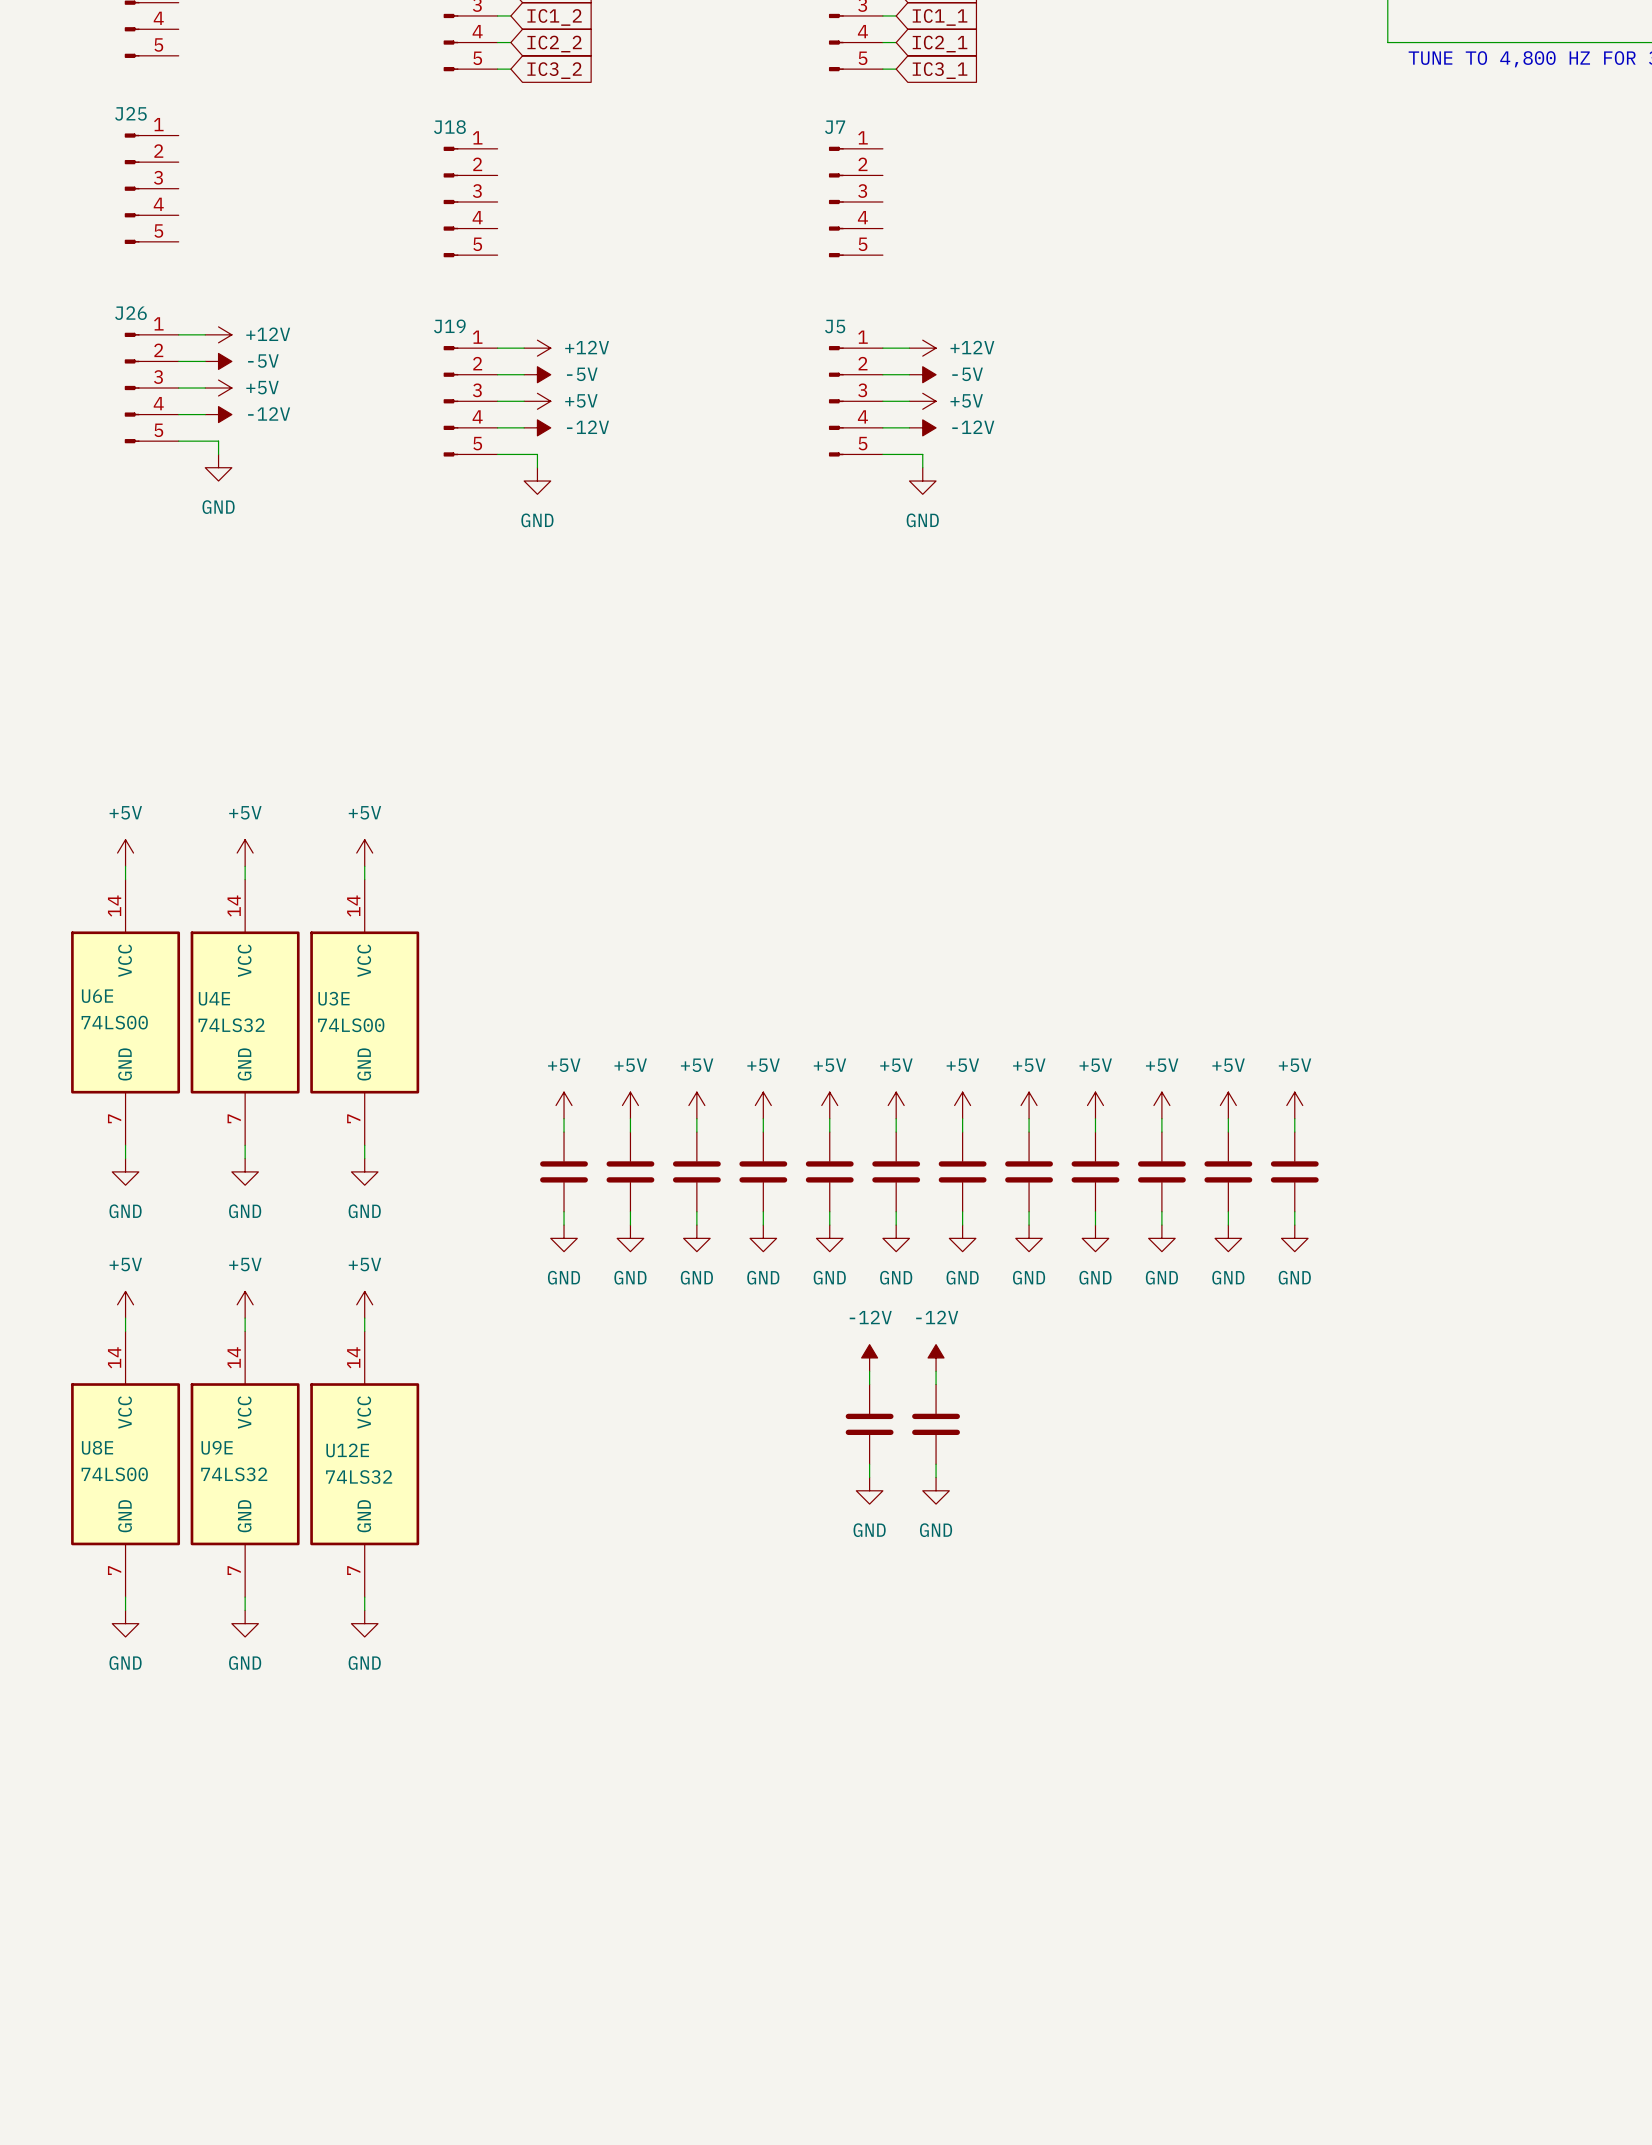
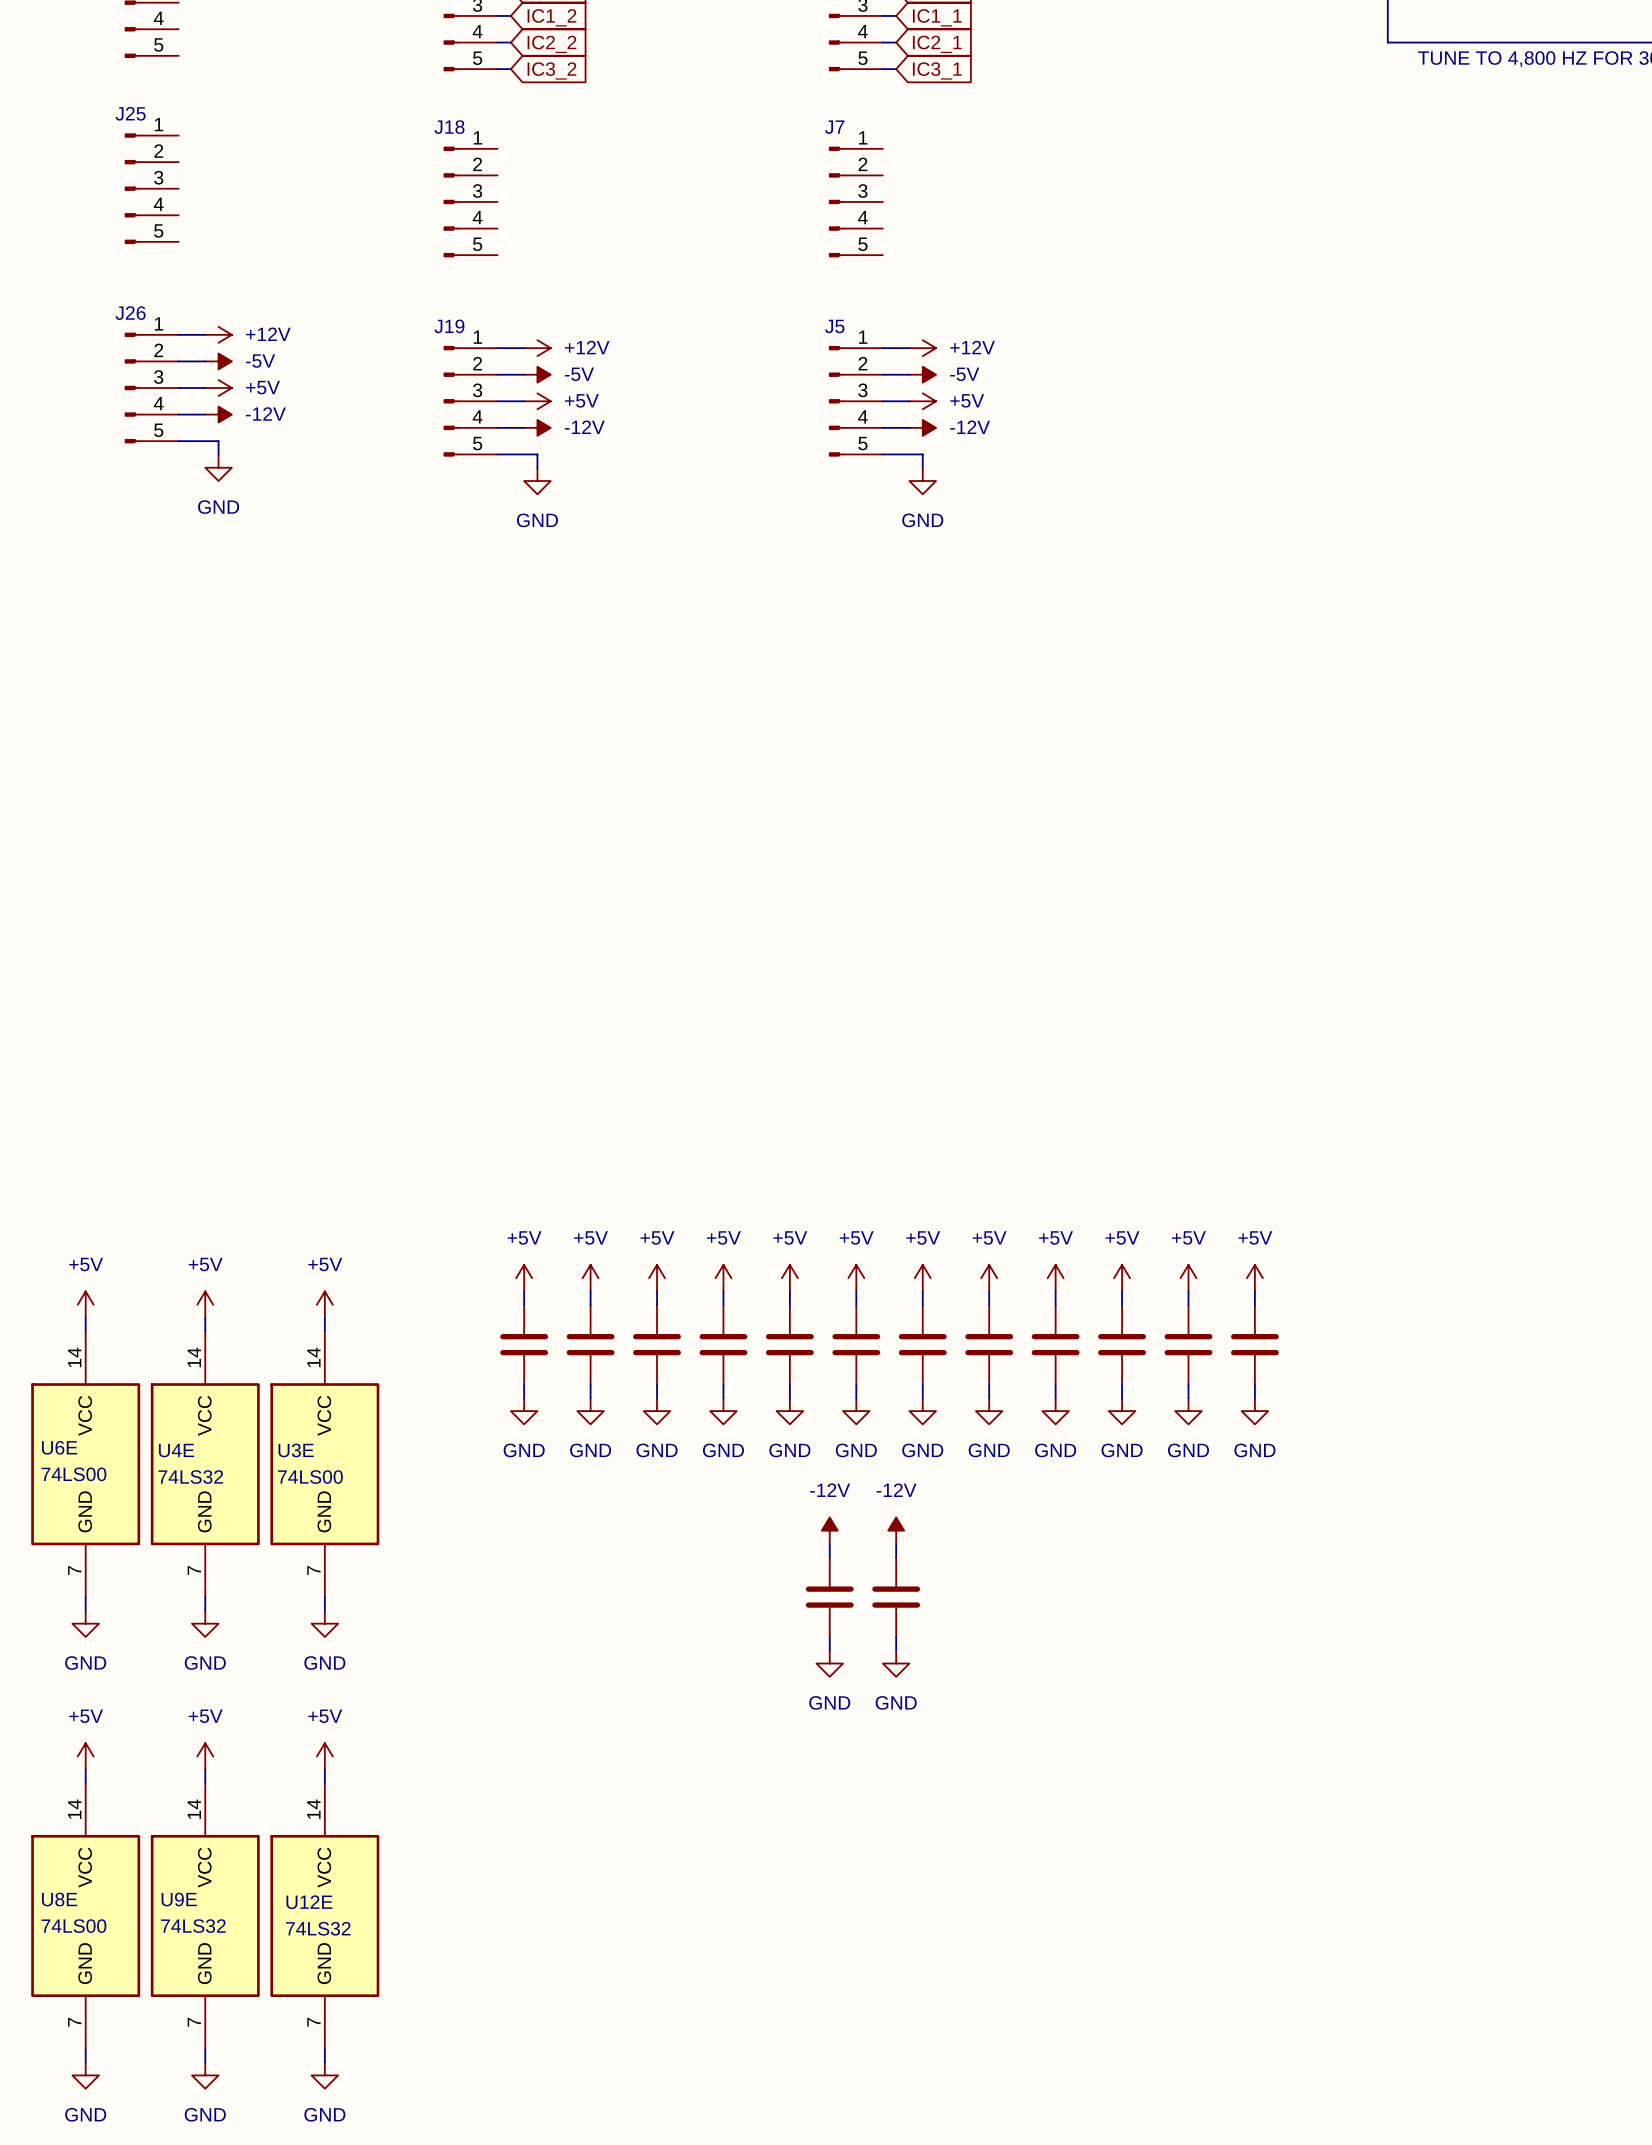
power symbol: +5V (125, 853) -> none
power symbol: +5V (245, 853) -> none
power symbol: +5V (364, 853) -> none
wire: (125, 866) (125, 879) -> none
wire: (245, 866) (245, 879) -> none
wire: (364, 866) (364, 879) -> none
U6E position: (125, 1012) -> (85, 1464)
U4E position: (245, 1012) -> (205, 1464)
U3E position: (364, 1012) -> (324, 1464)
power symbol: +5V (564, 1105) -> none
power symbol: +5V (630, 1105) -> none
power symbol: +5V (696, 1105) -> none
power symbol: +5V (763, 1105) -> none
power symbol: +5V (829, 1105) -> none
power symbol: +5V (896, 1105) -> none
power symbol: +5V (962, 1105) -> none
power symbol: +5V (1029, 1105) -> none
power symbol: +5V (1095, 1105) -> none
power symbol: +5V (1161, 1105) -> none
power symbol: +5V (1228, 1105) -> none
power symbol: +5V (1294, 1105) -> none
wire: (564, 1118) (564, 1132) -> (524, 1291) (524, 1304)
wire: (630, 1118) (630, 1132) -> (590, 1291) (590, 1304)
wire: (696, 1118) (696, 1132) -> (657, 1291) (657, 1304)
wire: (763, 1118) (763, 1132) -> (723, 1291) (723, 1304)
wire: (829, 1118) (829, 1132) -> (789, 1291) (789, 1304)
wire: (896, 1118) (896, 1132) -> (856, 1291) (856, 1304)
wire: (962, 1118) (962, 1132) -> (922, 1291) (922, 1304)
wire: (1029, 1118) (1029, 1132) -> (989, 1291) (989, 1304)
wire: (1095, 1118) (1095, 1132) -> (1055, 1291) (1055, 1304)
wire: (1161, 1118) (1161, 1132) -> (1122, 1291) (1122, 1304)
wire: (1228, 1118) (1228, 1132) -> (1188, 1291) (1188, 1304)
wire: (1294, 1118) (1294, 1132) -> (1254, 1291) (1254, 1304)
wire: (125, 1145) (125, 1158) -> (85, 1318) (85, 1331)
wire: (245, 1145) (245, 1158) -> (205, 1318) (205, 1331)
wire: (364, 1145) (364, 1158) -> (324, 1318) (324, 1331)
power symbol: GND (125, 1171) -> none
power symbol: GND (245, 1171) -> none
power symbol: GND (364, 1171) -> none
part: (564, 1171) -> none
part: (630, 1171) -> none
part: (696, 1171) -> none
part: (763, 1171) -> none
part: (829, 1171) -> none
part: (896, 1171) -> none
part: (962, 1171) -> none
part: (1029, 1171) -> none
part: (1095, 1171) -> none
part: (1161, 1171) -> none
part: (1228, 1171) -> none
part: (1294, 1171) -> none
wire: (564, 1211) (564, 1225) -> (524, 1384) (524, 1397)
wire: (630, 1211) (630, 1225) -> (590, 1384) (590, 1397)
wire: (696, 1211) (696, 1225) -> (657, 1384) (657, 1397)
wire: (763, 1211) (763, 1225) -> (723, 1384) (723, 1397)
wire: (829, 1211) (829, 1225) -> (789, 1384) (789, 1397)
wire: (896, 1211) (896, 1225) -> (856, 1384) (856, 1397)
wire: (962, 1211) (962, 1225) -> (922, 1384) (922, 1397)
wire: (1029, 1211) (1029, 1225) -> (989, 1384) (989, 1397)
wire: (1095, 1211) (1095, 1225) -> (1055, 1384) (1055, 1397)
wire: (1161, 1211) (1161, 1225) -> (1122, 1384) (1122, 1397)
wire: (1228, 1211) (1228, 1225) -> (1188, 1384) (1188, 1397)
wire: (1294, 1211) (1294, 1225) -> (1254, 1384) (1254, 1397)
power symbol: GND (564, 1238) -> none
power symbol: GND (630, 1238) -> none
power symbol: GND (696, 1238) -> none
power symbol: GND (763, 1238) -> none
power symbol: GND (829, 1238) -> none
power symbol: GND (896, 1238) -> none
power symbol: GND (962, 1238) -> none
power symbol: GND (1029, 1238) -> none
power symbol: GND (1095, 1238) -> none
power symbol: GND (1161, 1238) -> none
power symbol: GND (1228, 1238) -> none
power symbol: GND (1294, 1238) -> none
power symbol: none -> +5V (524, 1278)
power symbol: none -> +5V (590, 1278)
power symbol: none -> +5V (657, 1278)
power symbol: none -> +5V (723, 1278)
power symbol: none -> +5V (789, 1278)
power symbol: none -> +5V (856, 1278)
power symbol: none -> +5V (922, 1278)
power symbol: none -> +5V (989, 1278)
power symbol: none -> +5V (1055, 1278)
power symbol: none -> +5V (1122, 1278)
power symbol: none -> +5V (1188, 1278)
power symbol: none -> +5V (1254, 1278)
power symbol: none -> +5V (85, 1304)
power symbol: +5V (125, 1304) -> none
power symbol: none -> +5V (205, 1304)
power symbol: +5V (245, 1304) -> none
power symbol: none -> +5V (324, 1304)
power symbol: +5V (364, 1304) -> none
wire: (125, 1318) (125, 1331) -> none
wire: (245, 1318) (245, 1331) -> none
wire: (364, 1318) (364, 1331) -> none
part: none -> (524, 1344)
part: none -> (590, 1344)
part: none -> (657, 1344)
part: none -> (723, 1344)
part: none -> (789, 1344)
part: none -> (856, 1344)
part: none -> (922, 1344)
part: none -> (989, 1344)
part: none -> (1055, 1344)
part: none -> (1122, 1344)
part: none -> (1188, 1344)
part: none -> (1254, 1344)
power symbol: -12V (869, 1357) -> none
power symbol: -12V (936, 1357) -> none
wire: (869, 1371) (869, 1384) -> (829, 1543) (829, 1557)
wire: (936, 1371) (936, 1384) -> (896, 1543) (896, 1557)
power symbol: none -> GND (524, 1411)
power symbol: none -> GND (590, 1411)
power symbol: none -> GND (657, 1411)
power symbol: none -> GND (723, 1411)
power symbol: none -> GND (789, 1411)
power symbol: none -> GND (856, 1411)
power symbol: none -> GND (922, 1411)
power symbol: none -> GND (989, 1411)
power symbol: none -> GND (1055, 1411)
power symbol: none -> GND (1122, 1411)
power symbol: none -> GND (1188, 1411)
power symbol: none -> GND (1254, 1411)
part: (869, 1424) -> none
part: (936, 1424) -> none
U8E position: (125, 1464) -> (85, 1915)
U9E position: (245, 1464) -> (205, 1915)
U12E position: (364, 1464) -> (324, 1915)
wire: (869, 1464) (869, 1477) -> (829, 1636) (829, 1650)
wire: (936, 1464) (936, 1477) -> (896, 1636) (896, 1650)
power symbol: GND (869, 1490) -> none
power symbol: GND (936, 1490) -> none
power symbol: none -> -12V (829, 1530)
power symbol: none -> -12V (896, 1530)
wire: none -> (85, 1597) (85, 1610)
wire: (125, 1597) (125, 1610) -> (85, 1769) (85, 1783)
wire: none -> (205, 1597) (205, 1610)
wire: (245, 1597) (245, 1610) -> (205, 1769) (205, 1783)
wire: none -> (324, 1597) (324, 1610)
wire: (364, 1597) (364, 1610) -> (324, 1769) (324, 1783)
part: none -> (829, 1597)
part: none -> (896, 1597)
power symbol: none -> GND (85, 1623)
power symbol: GND (125, 1623) -> none
power symbol: none -> GND (205, 1623)
power symbol: GND (245, 1623) -> none
power symbol: none -> GND (324, 1623)
power symbol: GND (364, 1623) -> none
power symbol: none -> GND (829, 1663)
power symbol: none -> GND (896, 1663)
power symbol: none -> +5V (85, 1756)
power symbol: none -> +5V (205, 1756)
power symbol: none -> +5V (324, 1756)
wire: none -> (85, 2048) (85, 2062)
wire: none -> (205, 2048) (205, 2062)
wire: none -> (324, 2048) (324, 2062)
power symbol: none -> GND (85, 2075)
power symbol: none -> GND (205, 2075)
power symbol: none -> GND (324, 2075)

